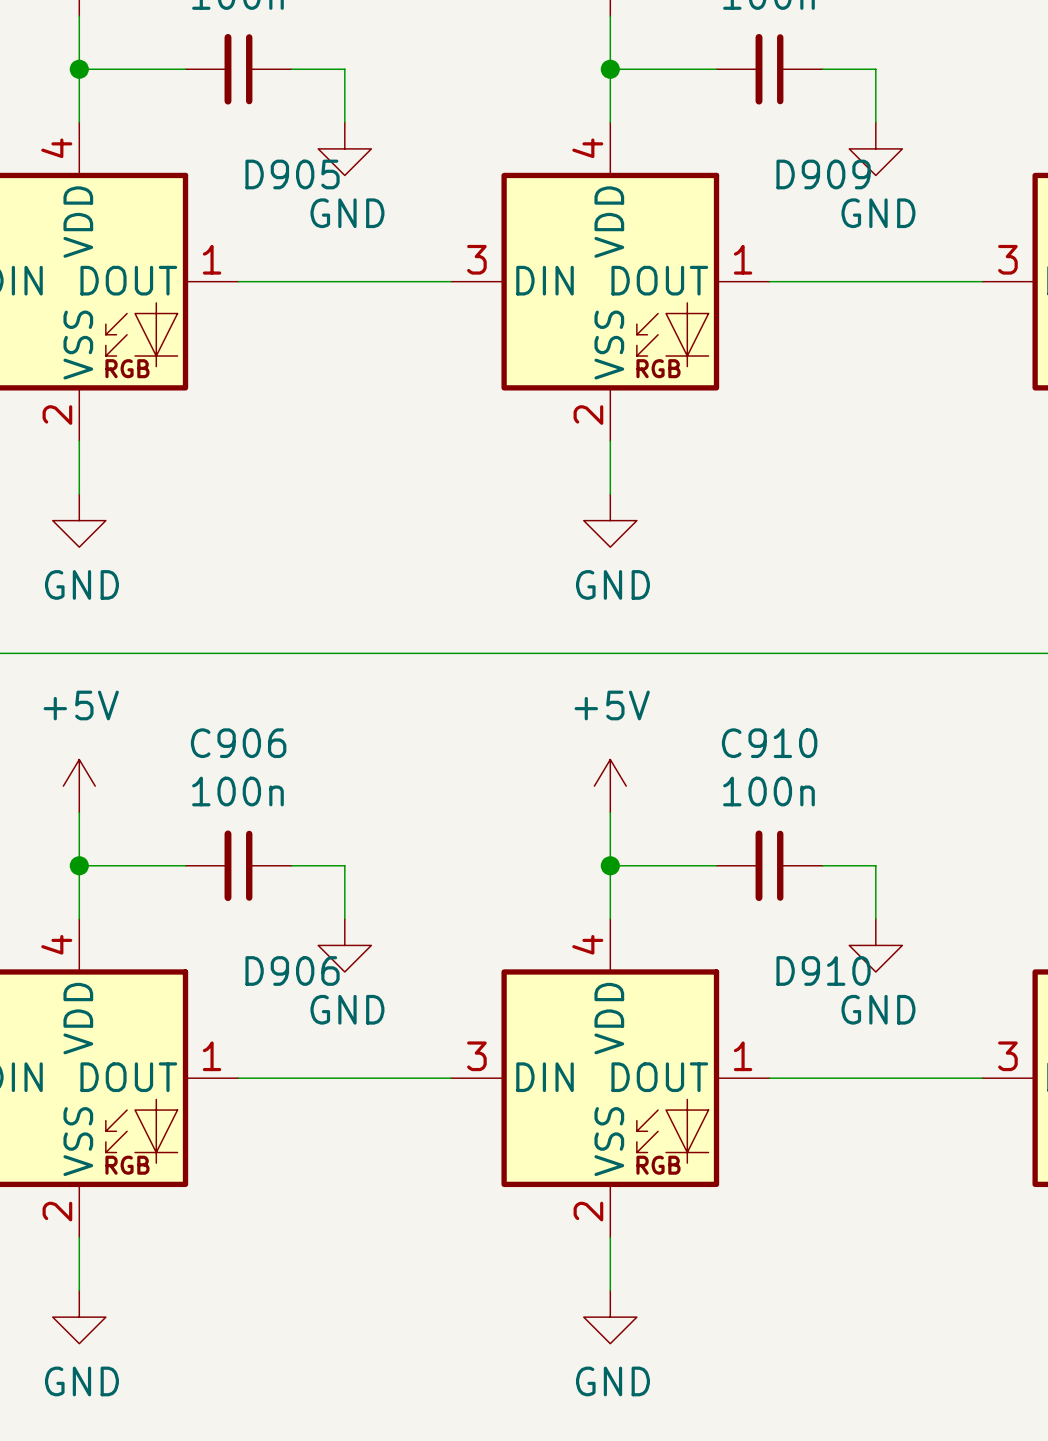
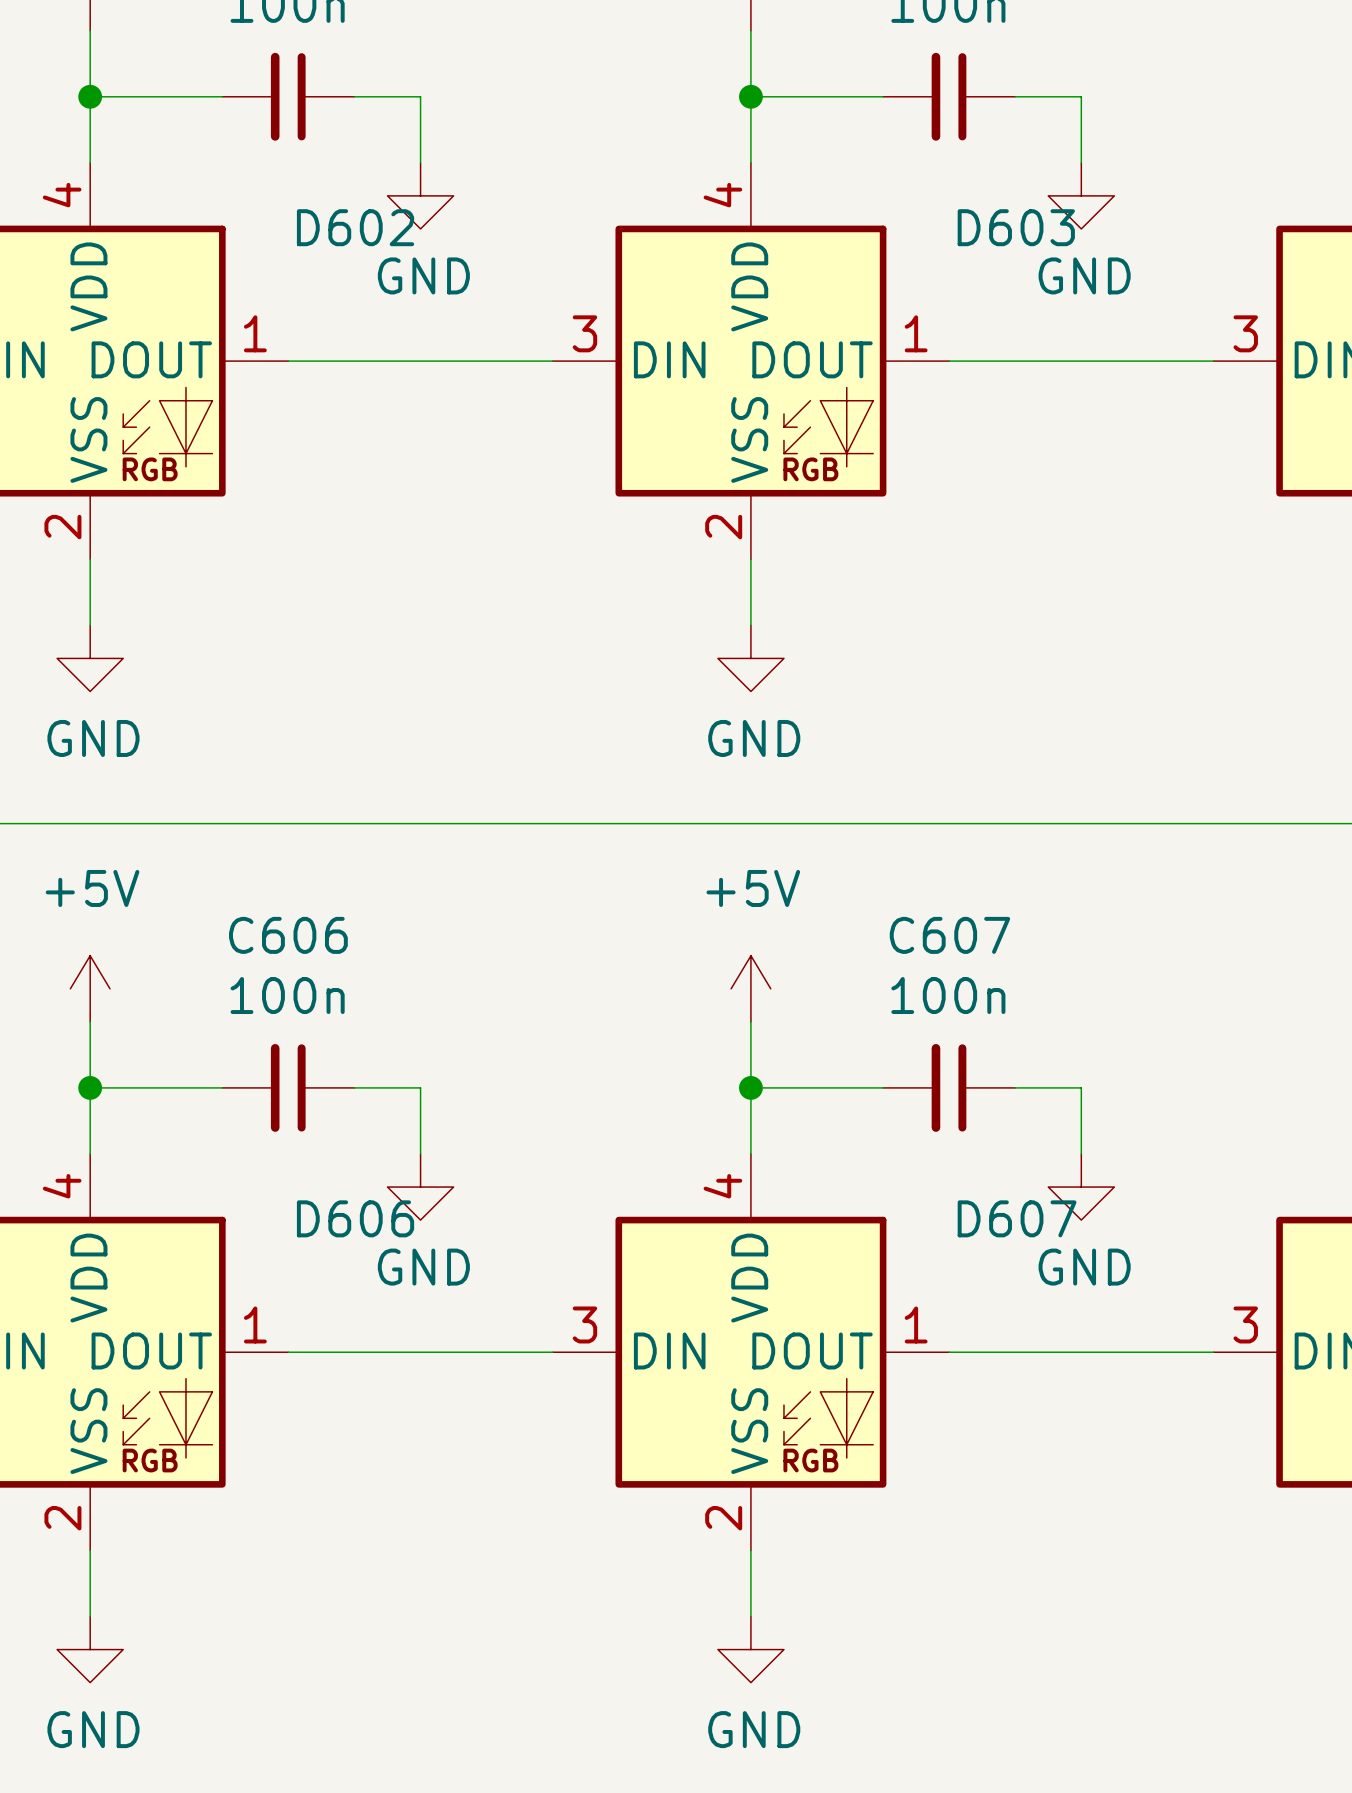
D905 name: D905 (292, 174) -> D602 (355, 227)
D909 name: D909 (823, 174) -> D603 (1016, 227)
C906 name: C906 (238, 743) -> C606 (288, 935)
C910 name: C910 (769, 743) -> C607 (949, 935)
D906 name: D906 (292, 970) -> D606 (355, 1218)
D910 name: D910 (823, 970) -> D607 (1017, 1218)

